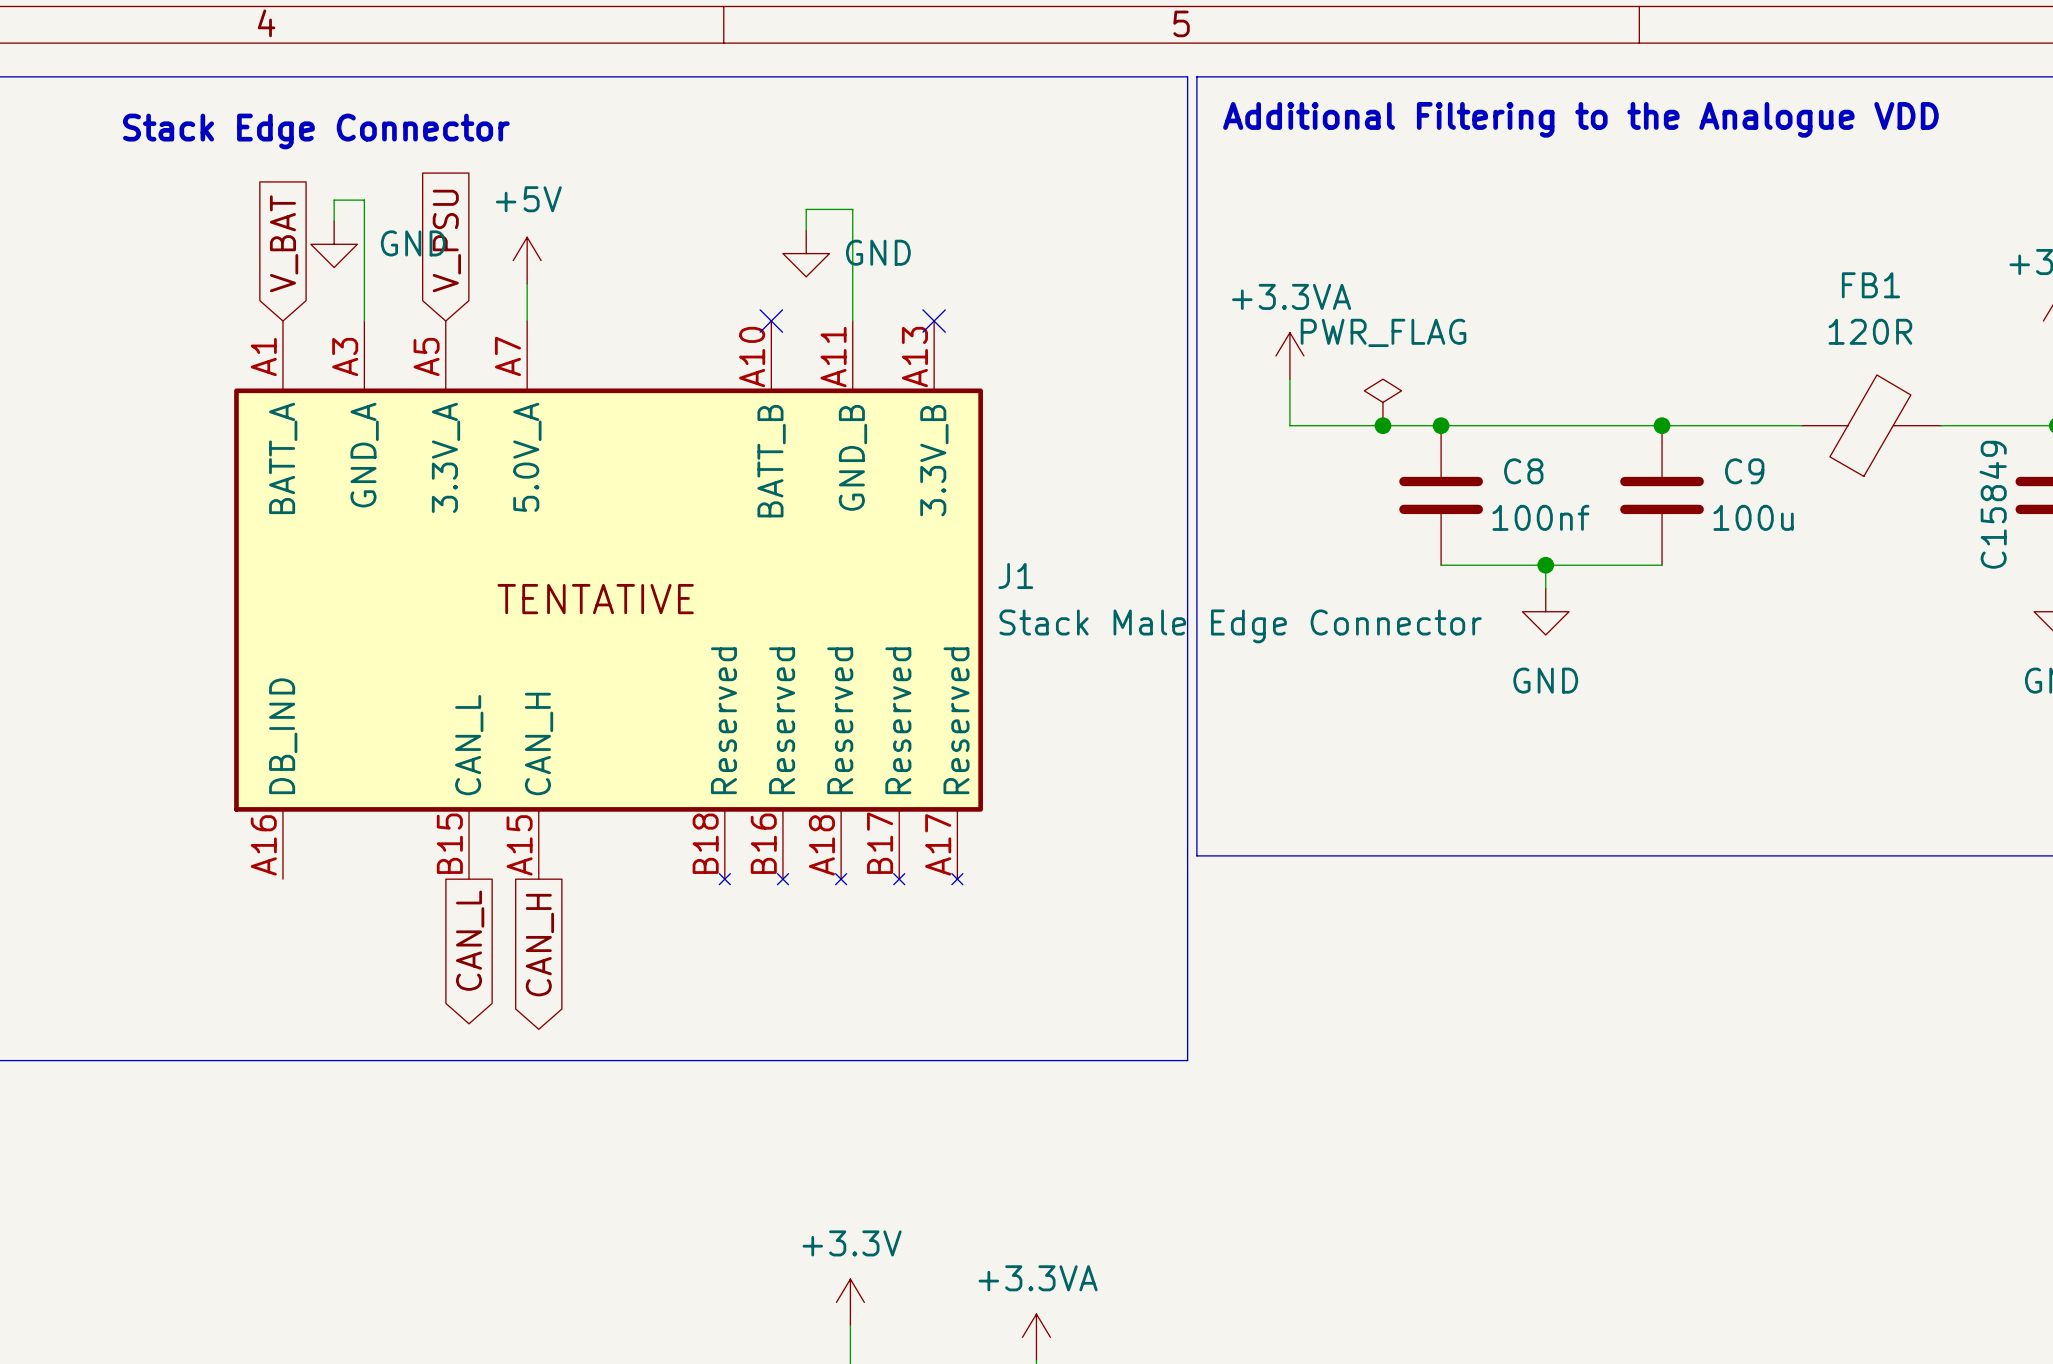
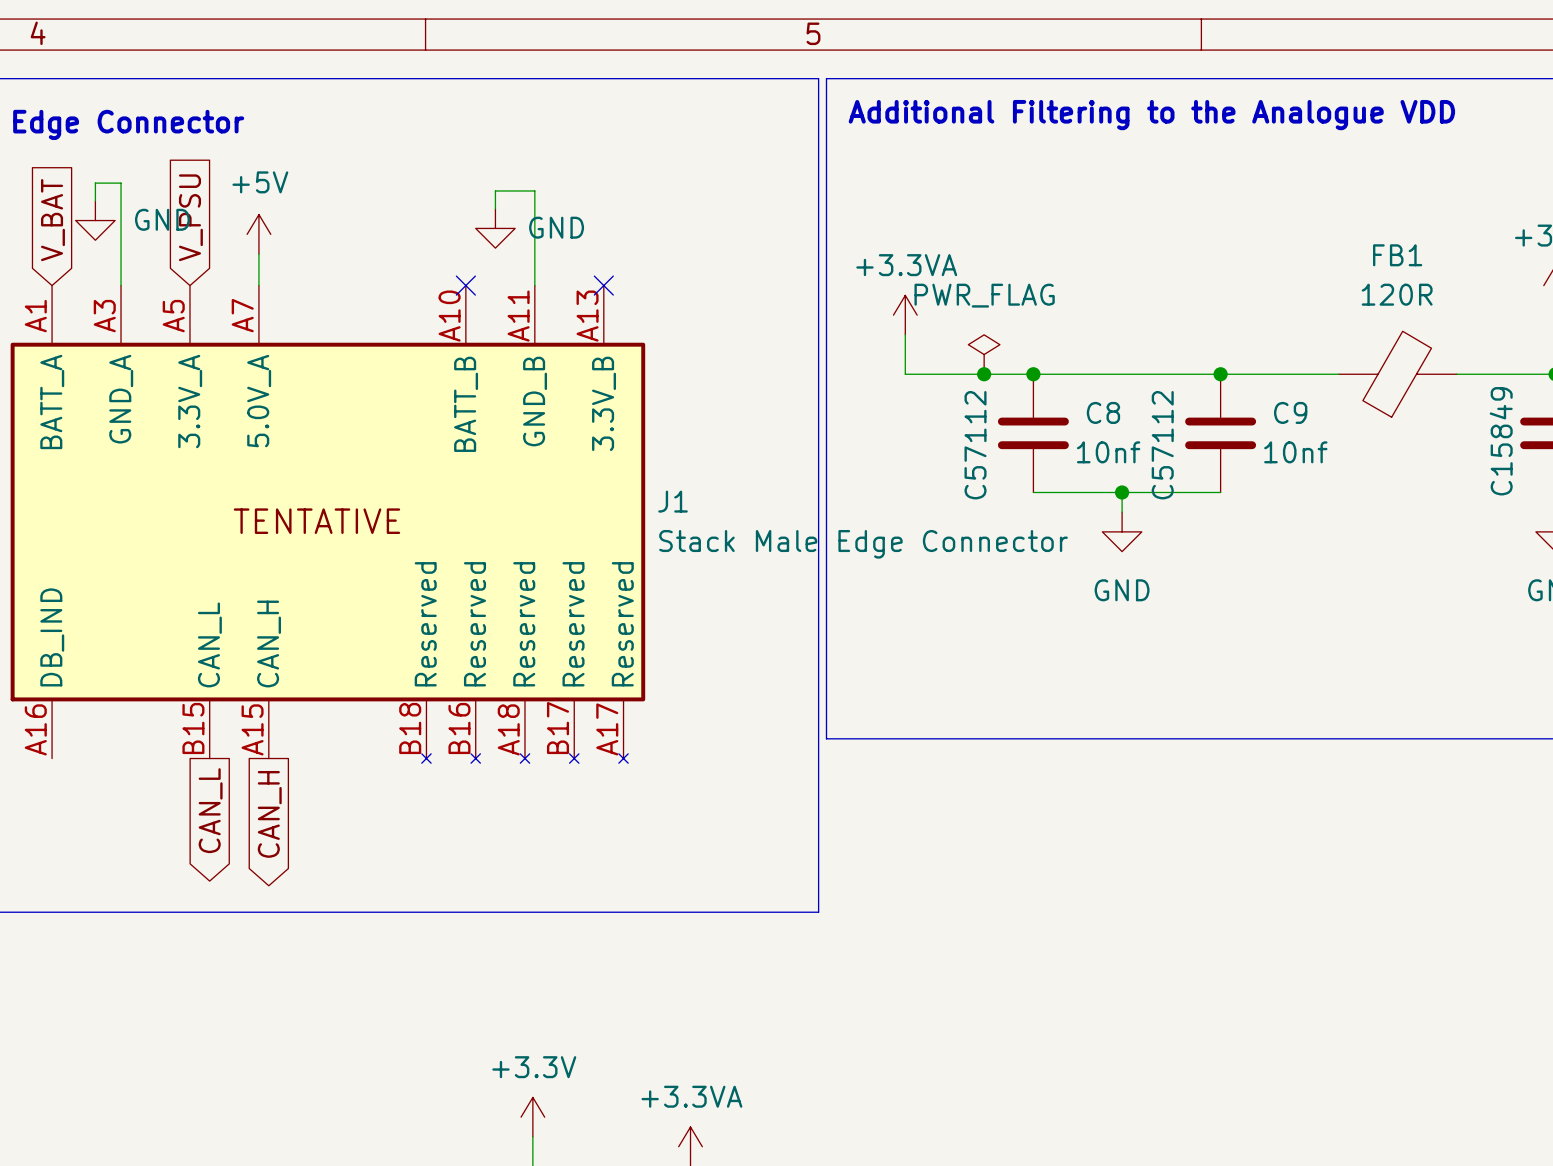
C8 text: none -> C57112 (975, 445)
C9 text: none -> C57112 (1162, 445)
C8 value: 100nf (1540, 517) -> 10nf (1108, 452)
C9 value: 100u (1753, 517) -> 10nf (1295, 452)

